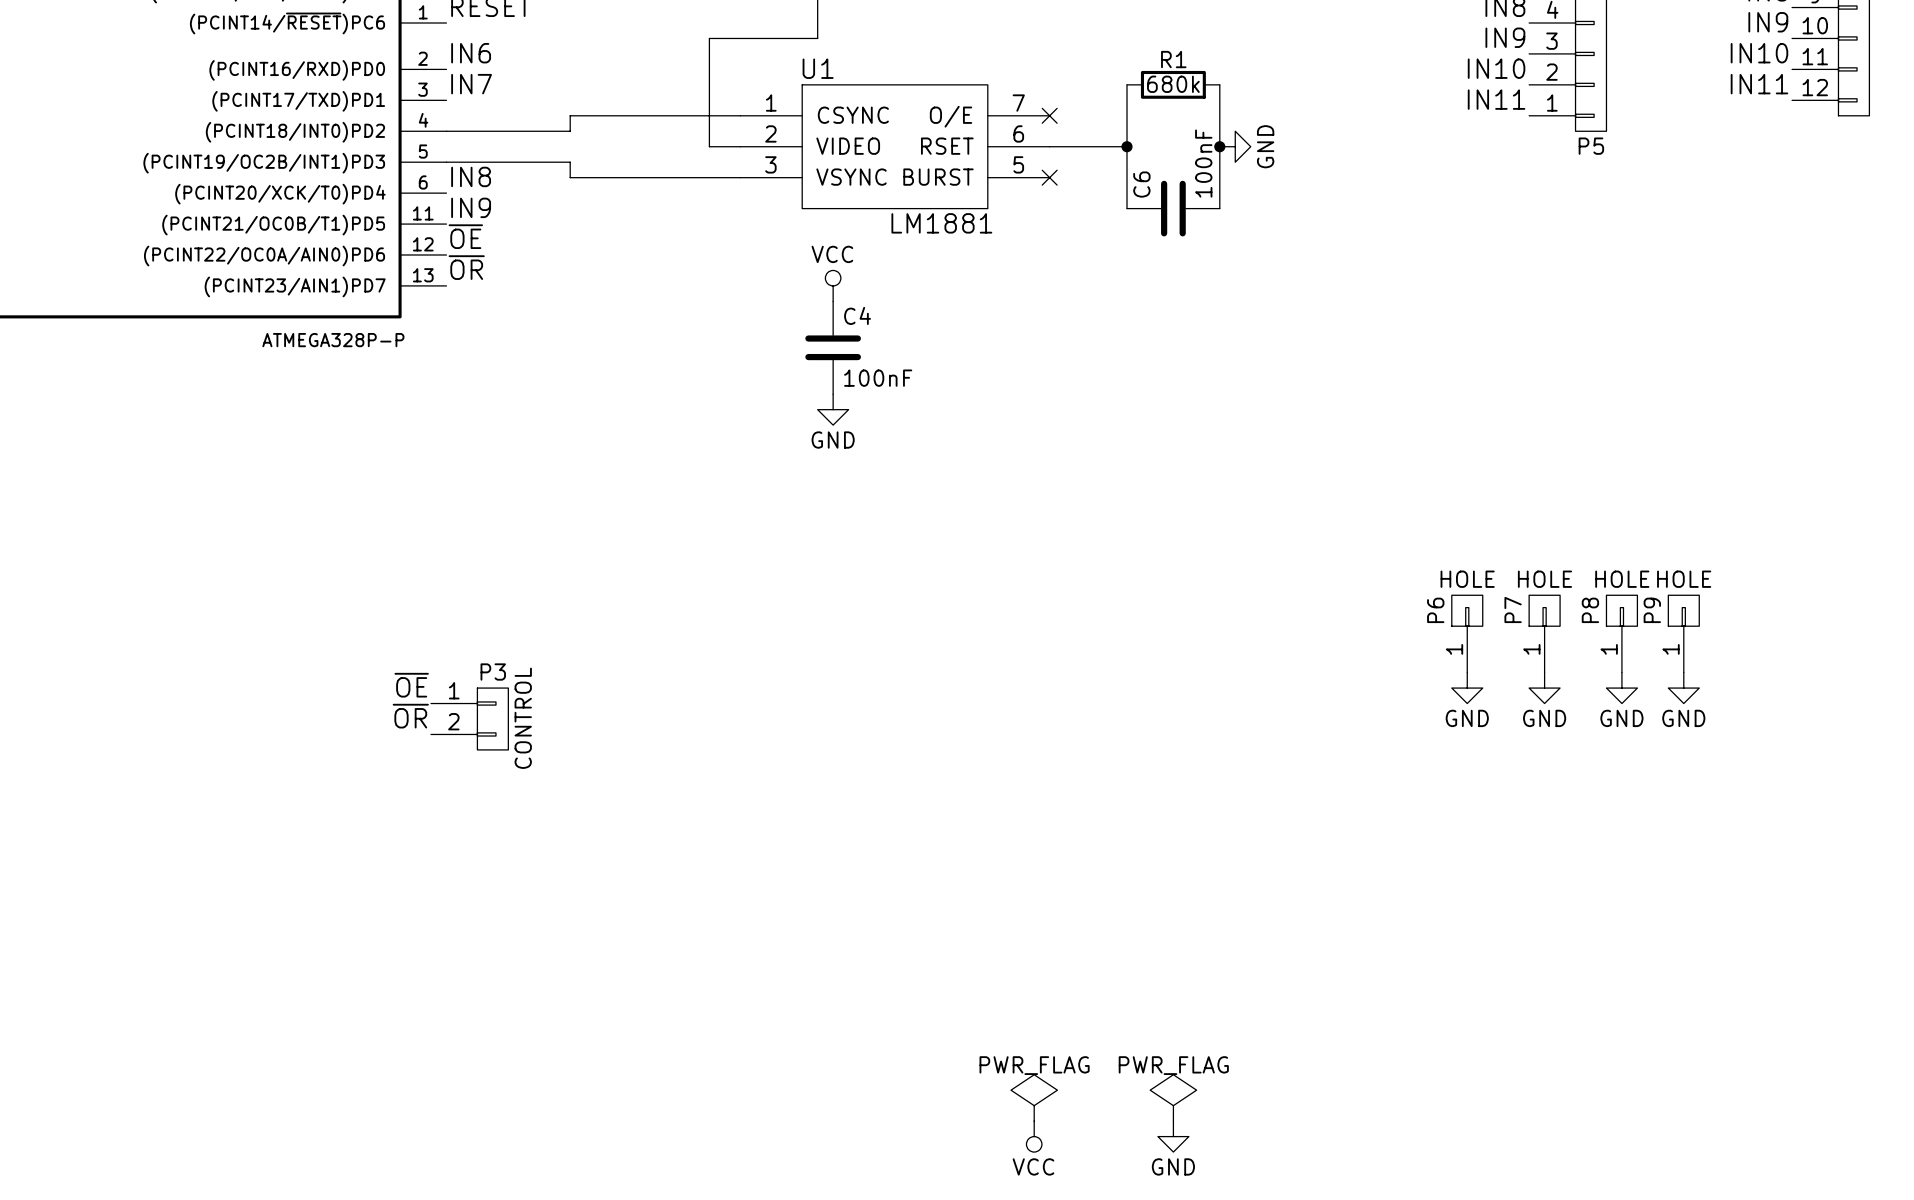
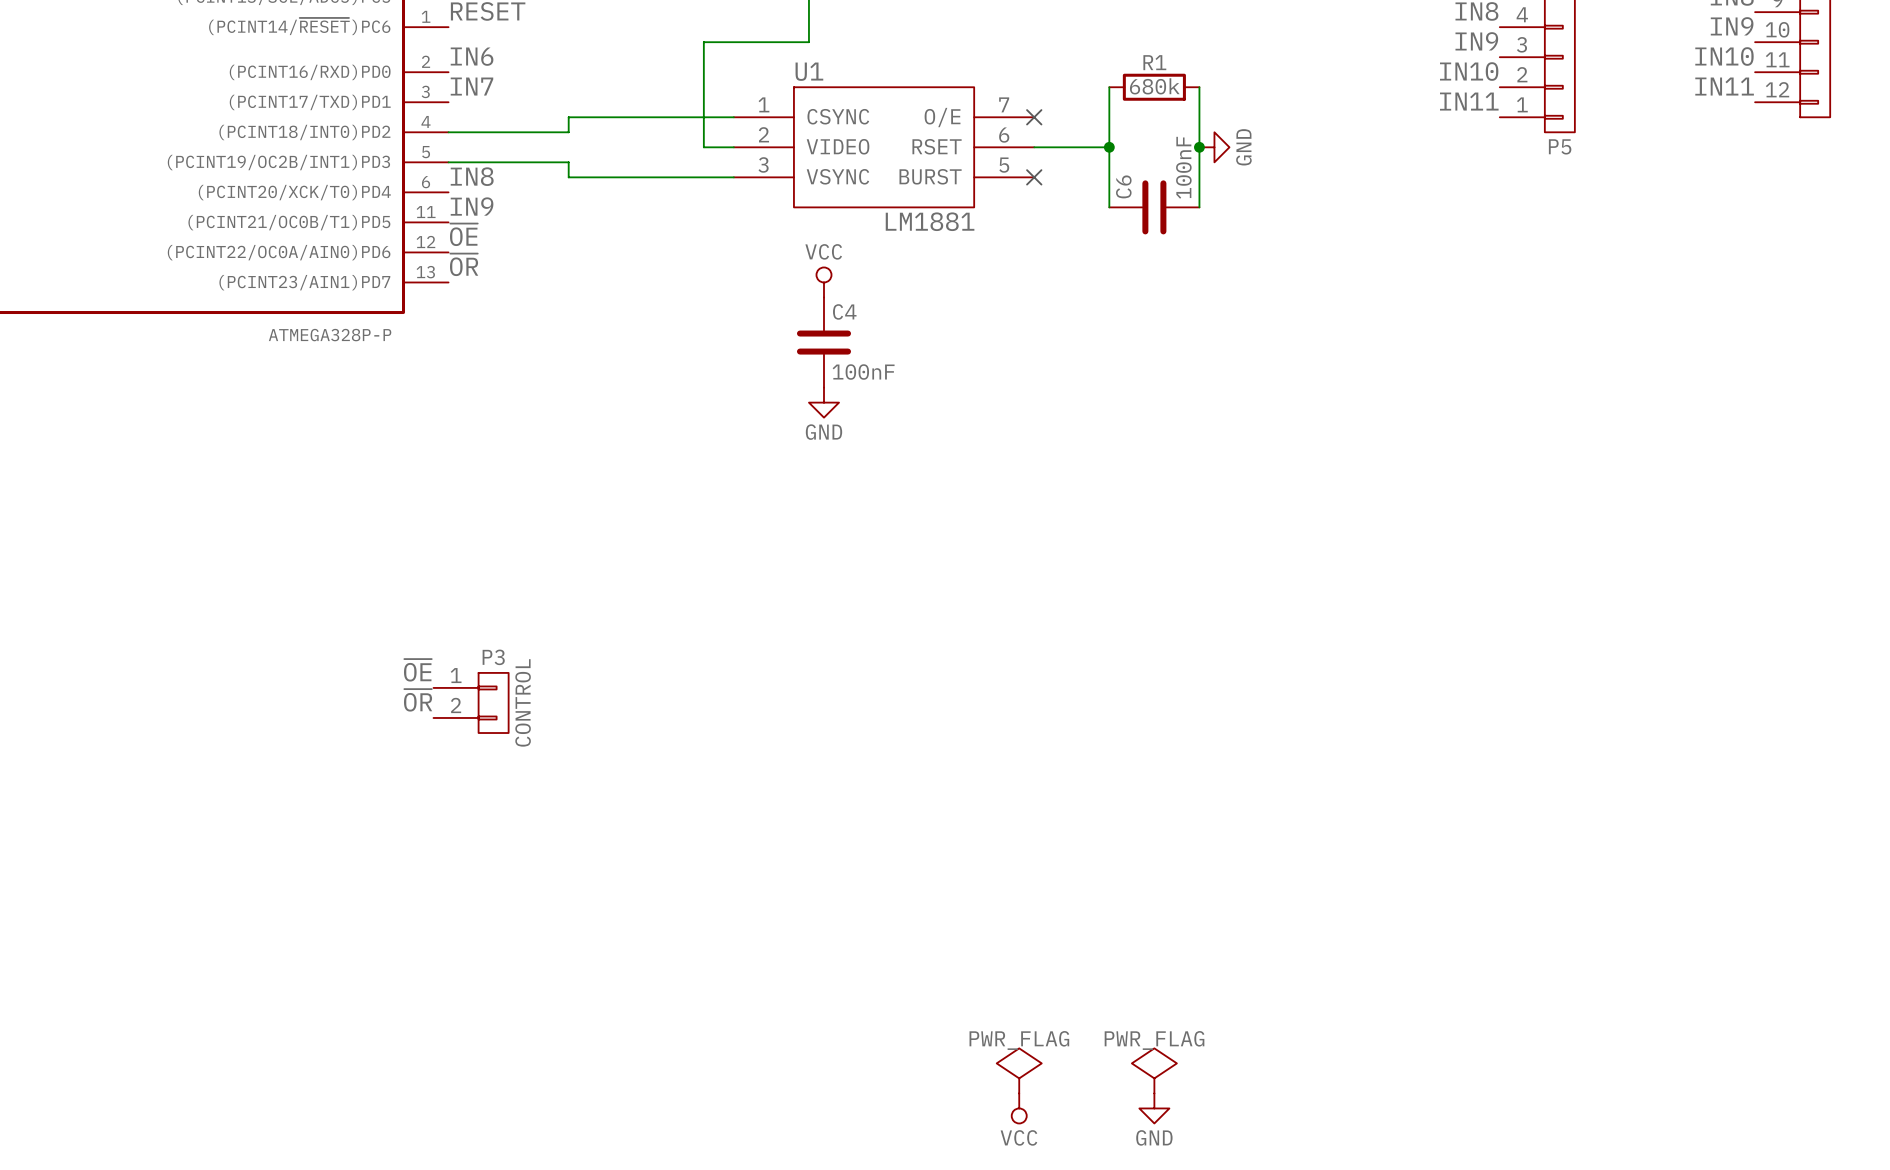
P6: HOLE (1467, 633) -> none
P7: HOLE (1544, 633) -> none
P8: HOLE (1621, 633) -> none
P9: HOLE (1683, 633) -> none
power symbol: GND (1467, 688) -> none
power symbol: GND (1544, 688) -> none
power symbol: GND (1621, 688) -> none
power symbol: GND (1683, 688) -> none

